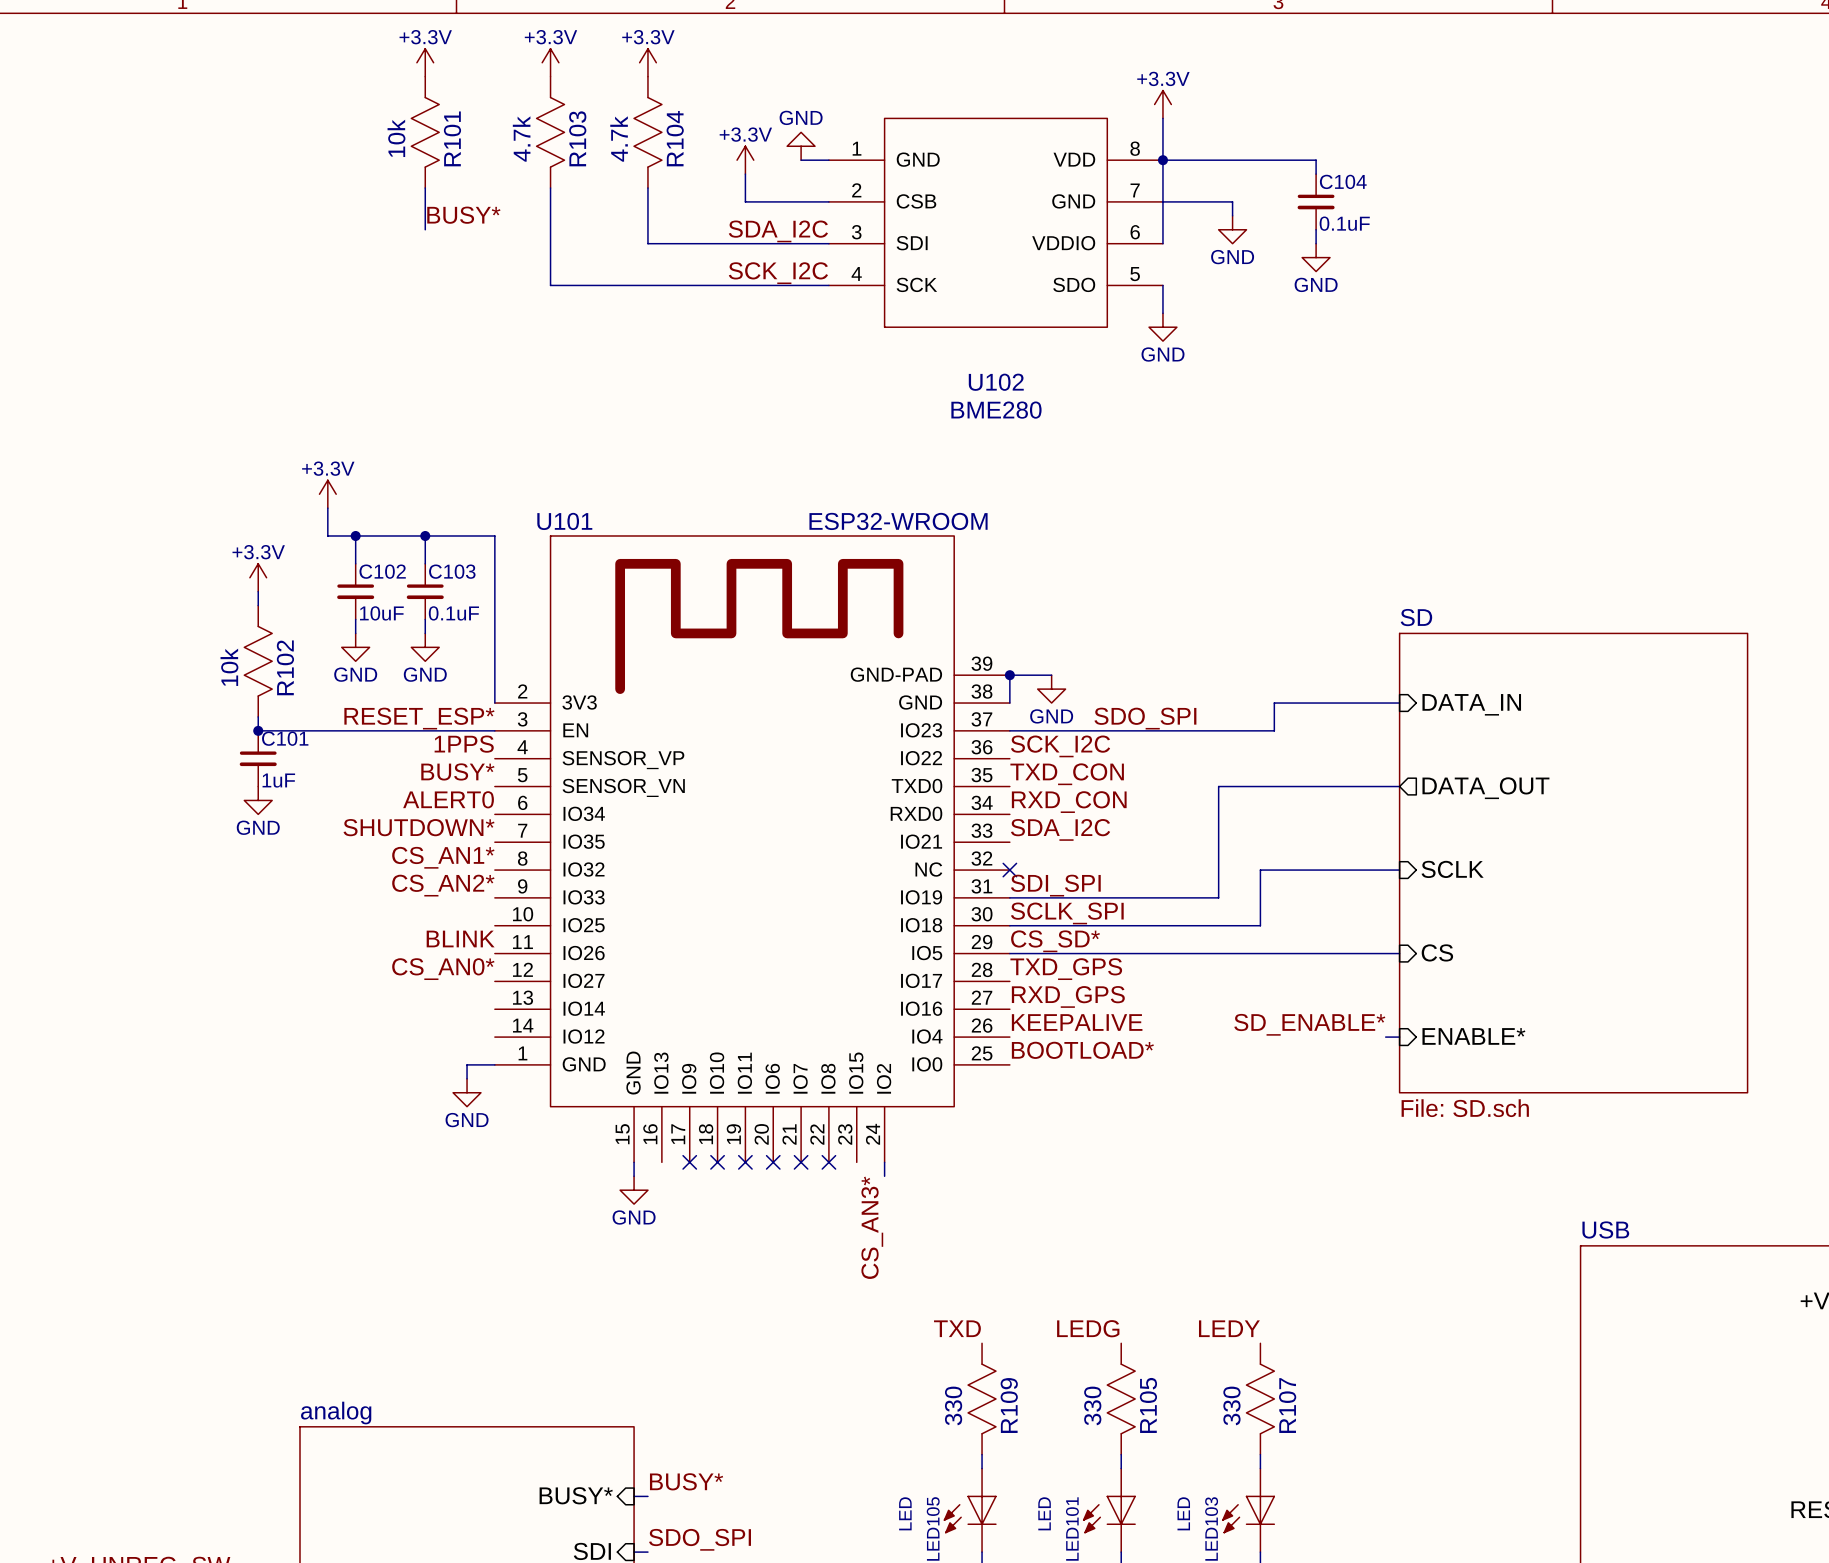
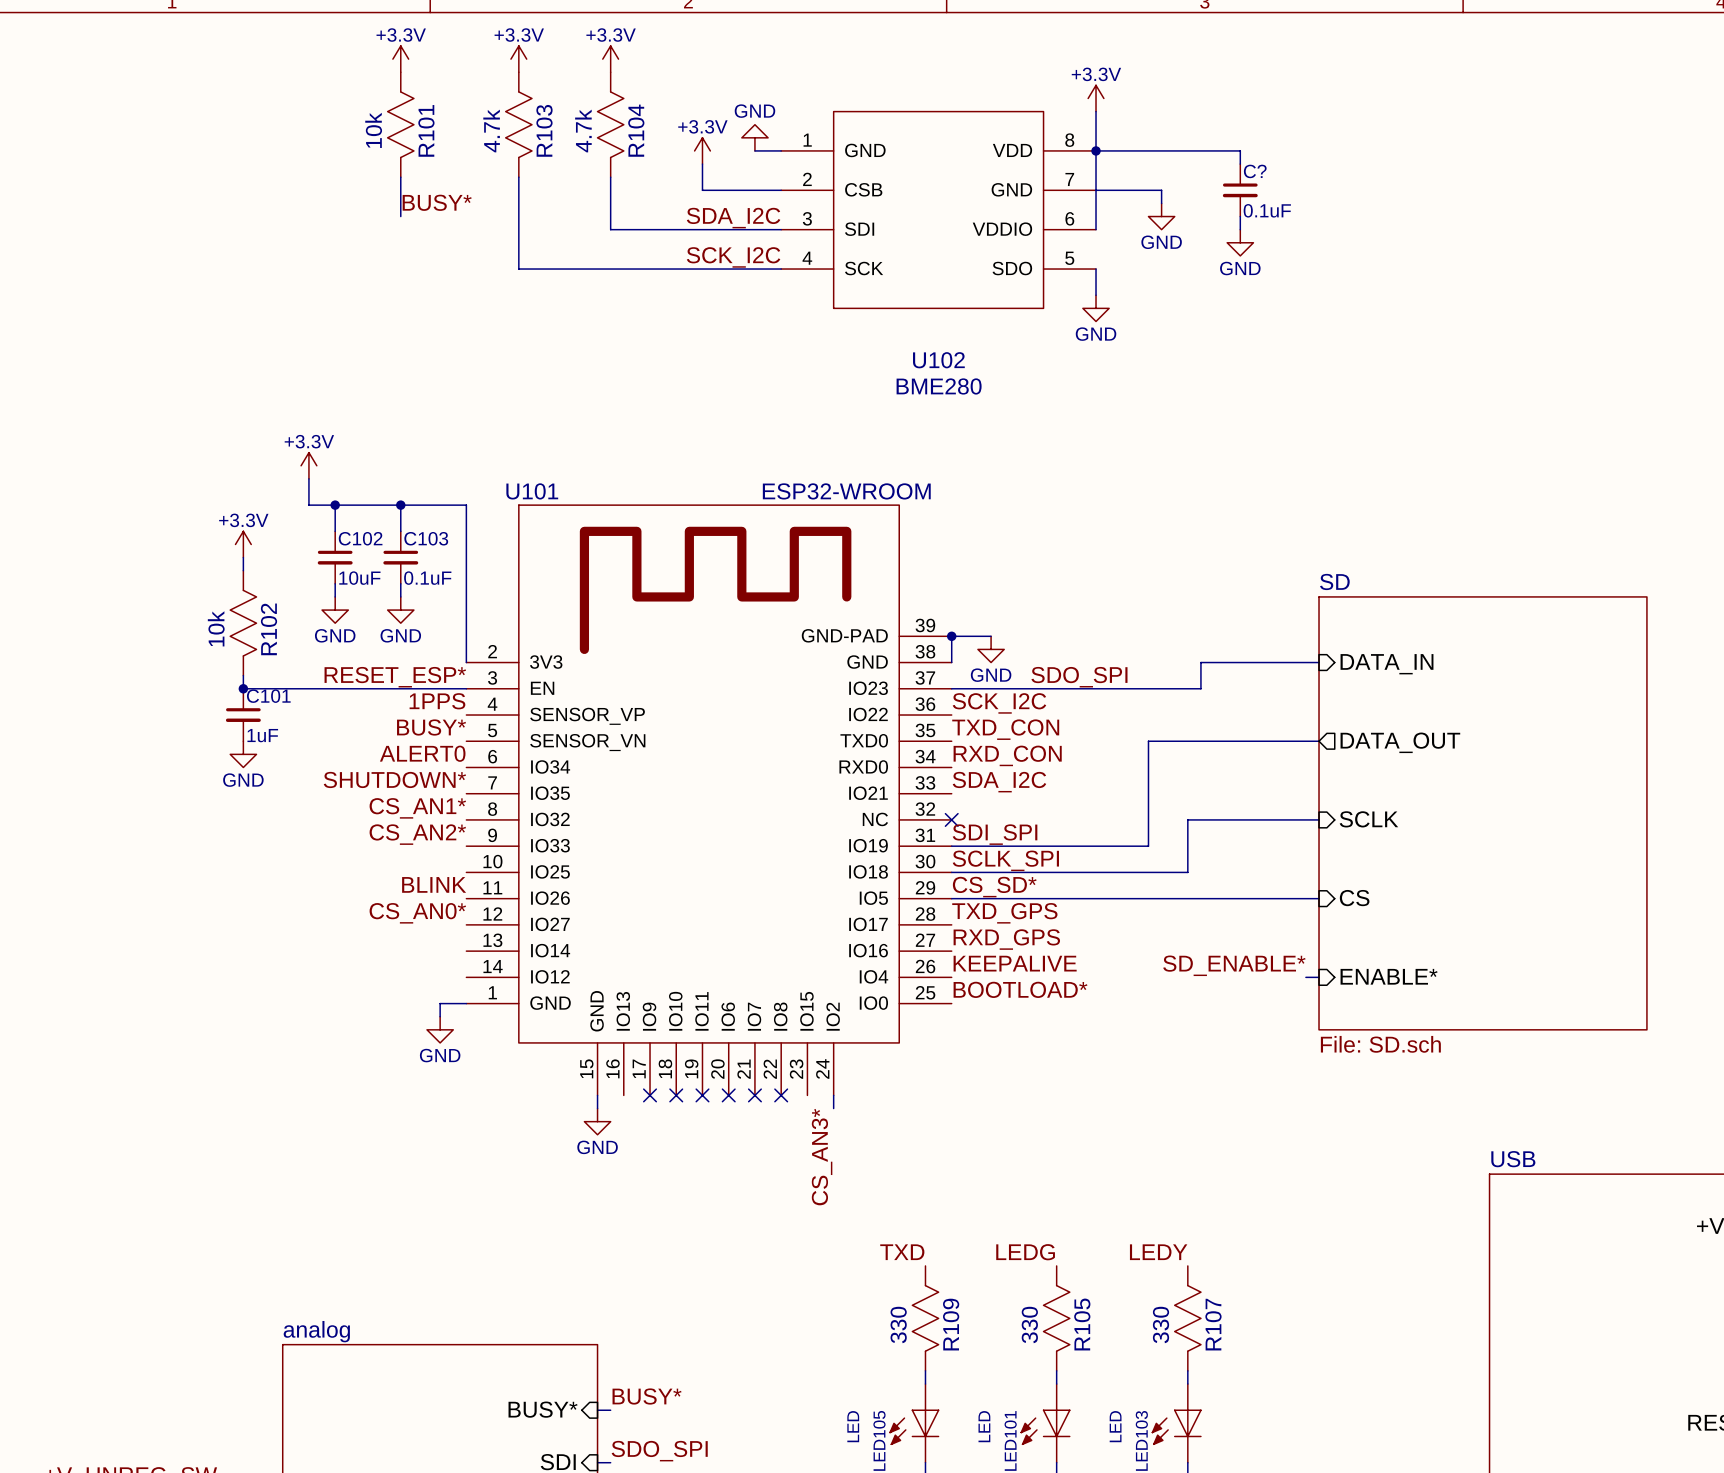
C104 name: C104 (1343, 181) -> C? (1255, 171)

